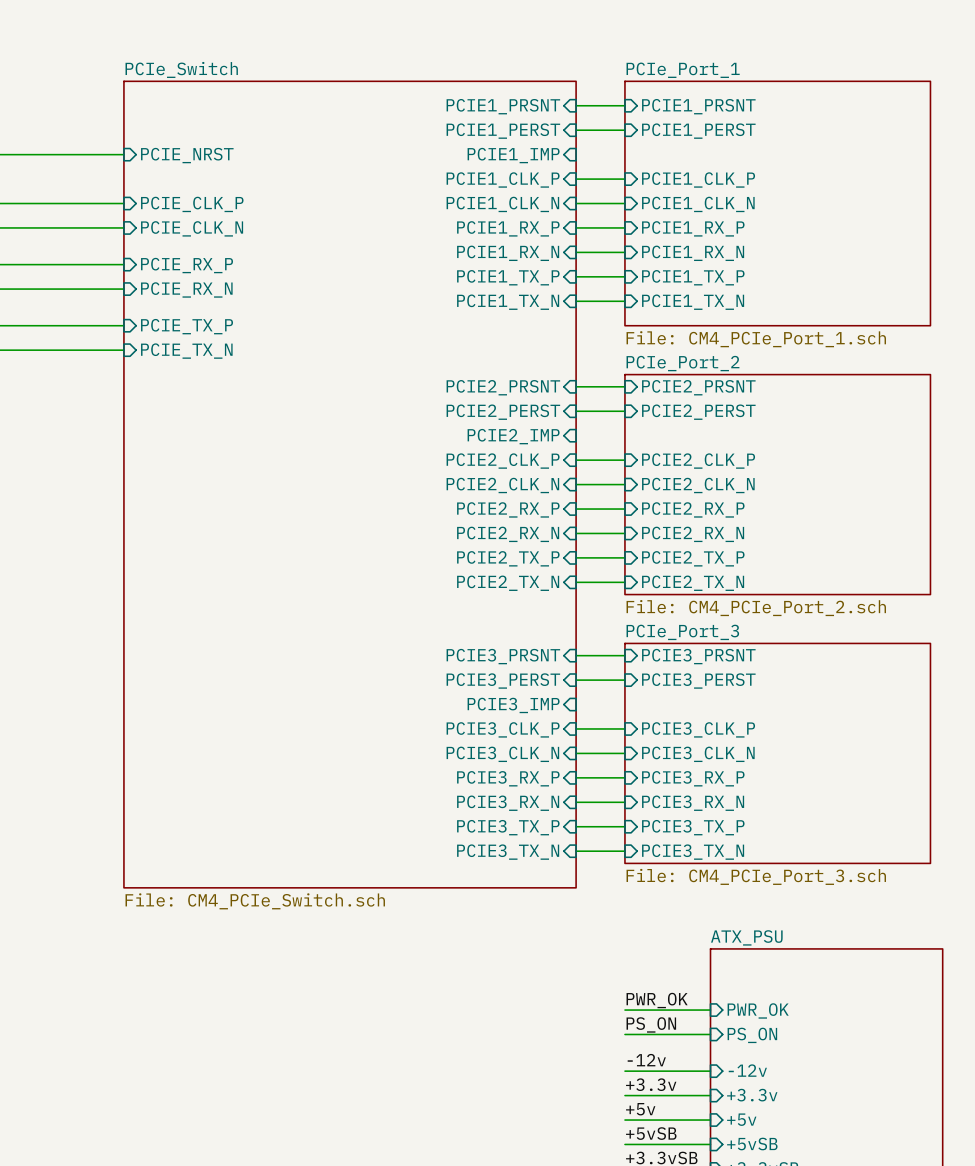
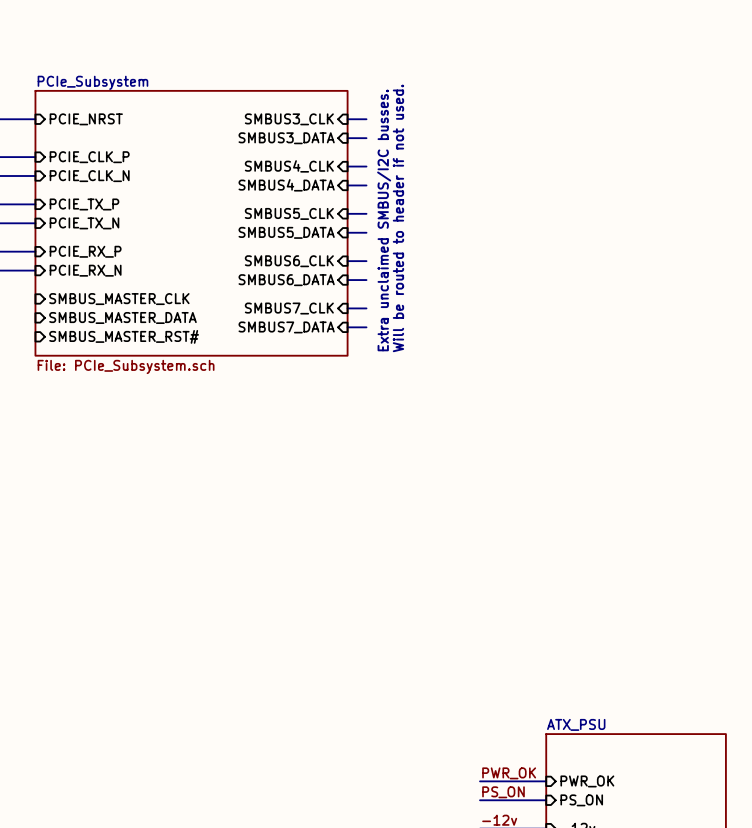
wire: (576, 105) (624, 105) -> none
sheet pin: PCIE1_PRSNT (503, 106) -> none
sheet pin: PCIE1_PRSNT (698, 106) -> none
wire: (576, 130) (624, 130) -> none
sheet pin: PCIE1_PERST (503, 131) -> none
sheet pin: PCIE1_PERST (698, 131) -> none
wire: (50, 154) (123, 154) -> none
wire: none -> (347, 119) (366, 119)
sheet pin position: PCIE_NRST (187, 155) -> PCIE_NRST (86, 119)
sheet pin: none -> SMBUS3_CLK (289, 119)
sheet pin: PCIE1_IMP (513, 155) -> none
wire: none -> (347, 138) (366, 138)
wire: (576, 179) (624, 179) -> none
sheet pin: none -> SMBUS3_DATA (286, 138)
sheet pin: PCIE1_CLK_P (503, 180) -> none
sheet pin: PCIE1_CLK_P (698, 180) -> none
wire: (50, 203) (123, 203) -> none
wire: (576, 203) (624, 203) -> none
sheet PCIe_Port_1: File: CM4_PCIe_Port_1.sch (777, 203) -> none
sheet pin position: PCIE_CLK_P (192, 204) -> PCIE_CLK_P (89, 157)
sheet pin: PCIE1_CLK_N (502, 204) -> none
sheet pin: PCIE1_CLK_N (698, 204) -> none
wire: none -> (347, 166) (366, 166)
sheet pin: none -> SMBUS4_CLK (289, 166)
wire: (50, 227) (123, 227) -> none
wire: (576, 227) (624, 227) -> none
sheet pin position: PCIE_CLK_N (192, 228) -> PCIE_CLK_N (89, 176)
sheet pin: PCIE1_RX_P (508, 228) -> none
sheet pin: PCIE1_RX_P (693, 228) -> none
wire: none -> (347, 185) (366, 185)
sheet pin: none -> SMBUS4_DATA (286, 185)
wire: (576, 252) (624, 252) -> none
sheet pin: PCIE1_RX_N (508, 253) -> none
sheet pin: PCIE1_RX_N (693, 253) -> none
wire: (50, 264) (123, 264) -> none
sheet pin position: PCIE_RX_P (187, 265) -> PCIE_RX_P (85, 251)
text: none -> Will be routed to header if not used. (398, 218)
wire: none -> (347, 213) (366, 213)
wire: (576, 276) (624, 276) -> none
sheet pin: none -> SMBUS5_CLK (289, 213)
sheet pin: PCIE1_TX_P (508, 277) -> none
sheet pin: PCIE1_TX_P (693, 277) -> none
text: none -> Extra unclaimed SMBUS/I2C busses. (384, 220)
wire: (50, 289) (123, 289) -> none
sheet pin position: PCIE_RX_N (186, 289) -> PCIE_RX_N (85, 270)
sheet PCIe_Subsystem: none -> File: PCIe_Subsystem.sch (191, 223)
wire: none -> (347, 232) (366, 232)
wire: (576, 301) (624, 301) -> none
sheet pin: none -> SMBUS5_DATA (286, 232)
sheet pin: PCIE1_TX_N (508, 302) -> none
sheet pin: PCIE1_TX_N (693, 302) -> none
wire: (50, 325) (123, 325) -> none
sheet pin position: PCIE_TX_P (187, 326) -> PCIE_TX_P (84, 204)
wire: none -> (347, 261) (366, 261)
sheet pin: none -> SMBUS6_CLK (289, 261)
wire: (50, 350) (123, 350) -> none
sheet pin position: PCIE_TX_N (186, 351) -> PCIE_TX_N (84, 223)
wire: none -> (347, 280) (366, 280)
sheet pin: none -> SMBUS6_DATA (286, 280)
wire: (576, 386) (624, 386) -> none
sheet pin: none -> SMBUS_MASTER_CLK (119, 299)
sheet pin: PCIE2_PRSNT (503, 387) -> none
sheet pin: PCIE2_PRSNT (698, 387) -> none
sheet pin: none -> SMBUS7_CLK (289, 308)
wire: none -> (347, 308) (366, 308)
wire: (576, 411) (624, 411) -> none
sheet pin: none -> SMBUS_MASTER_DATA (122, 317)
sheet pin: PCIE2_PERST (503, 412) -> none
sheet pin: PCIE2_PERST (698, 412) -> none
wire: none -> (347, 327) (366, 327)
sheet pin: none -> SMBUS7_DATA (286, 327)
sheet pin: none -> SMBUS_MASTER_RST# (124, 336)
sheet pin: PCIE2_IMP (513, 436) -> none
wire: (576, 460) (624, 460) -> none
sheet pin: PCIE2_CLK_P (503, 461) -> none
sheet pin: PCIE2_CLK_P (698, 461) -> none
sheet PCIe_Switch: File: CM4_PCIe_Switch.sch (350, 484) -> none
wire: (576, 484) (624, 484) -> none
sheet PCIe_Port_2: File: CM4_PCIe_Port_2.sch (777, 484) -> none
sheet pin: PCIE2_CLK_N (502, 485) -> none
sheet pin: PCIE2_CLK_N (698, 485) -> none
sheet pin: PCIE2_RX_P (508, 509) -> none
wire: (576, 509) (624, 509) -> none
sheet pin: PCIE2_RX_P (693, 509) -> none
wire: (576, 533) (624, 533) -> none
sheet pin: PCIE2_RX_N (508, 534) -> none
sheet pin: PCIE2_RX_N (693, 534) -> none
wire: (576, 557) (624, 557) -> none
sheet pin: PCIE2_TX_P (508, 558) -> none
sheet pin: PCIE2_TX_P (693, 558) -> none
wire: (576, 582) (624, 582) -> none
sheet pin: PCIE2_TX_N (508, 583) -> none
sheet pin: PCIE2_TX_N (693, 583) -> none
wire: (576, 655) (624, 655) -> none
sheet pin: PCIE3_PRSNT (503, 656) -> none
sheet pin: PCIE3_PRSNT (698, 656) -> none
wire: (576, 680) (624, 680) -> none
sheet pin: PCIE3_PERST (503, 681) -> none
sheet pin: PCIE3_PERST (698, 681) -> none
sheet pin: PCIE3_IMP (513, 705) -> none
wire: (576, 728) (624, 728) -> none
sheet pin: PCIE3_CLK_P (503, 729) -> none
sheet pin: PCIE3_CLK_P (698, 729) -> none
wire: (576, 753) (624, 753) -> none
sheet PCIe_Port_3: File: CM4_PCIe_Port_3.sch (777, 753) -> none
sheet pin: PCIE3_CLK_N (502, 754) -> none
sheet pin: PCIE3_CLK_N (698, 754) -> none
wire: (576, 777) (624, 777) -> none
sheet pin: PCIE3_RX_P (508, 778) -> none
sheet pin: PCIE3_RX_P (693, 778) -> none
wire: (576, 802) (624, 802) -> none
sheet pin: PCIE3_RX_N (508, 803) -> none
sheet pin: PCIE3_RX_N (693, 803) -> none
wire: (576, 826) (624, 826) -> none
sheet pin: PCIE3_TX_P (508, 827) -> none
sheet pin: PCIE3_TX_P (693, 827) -> none
wire: (576, 851) (624, 851) -> none
sheet pin: PCIE3_TX_N (508, 852) -> none
sheet pin: PCIE3_TX_N (693, 852) -> none

